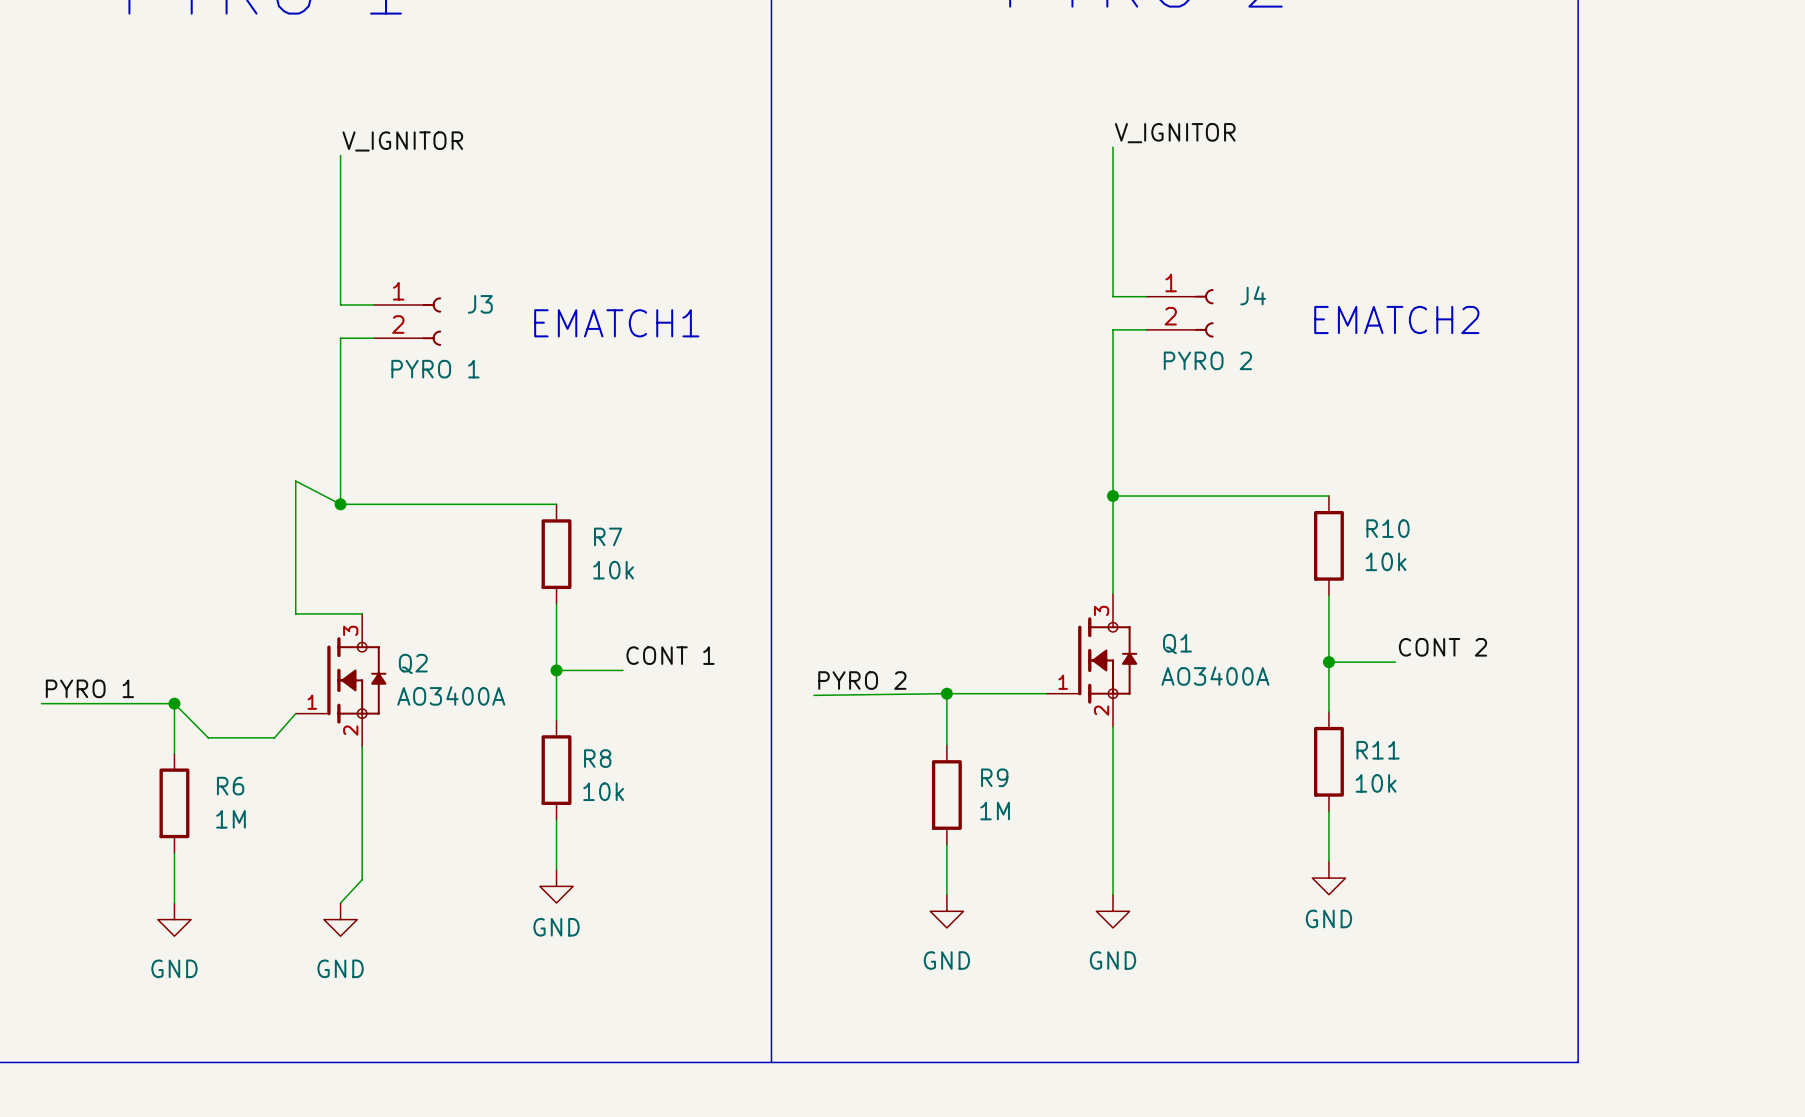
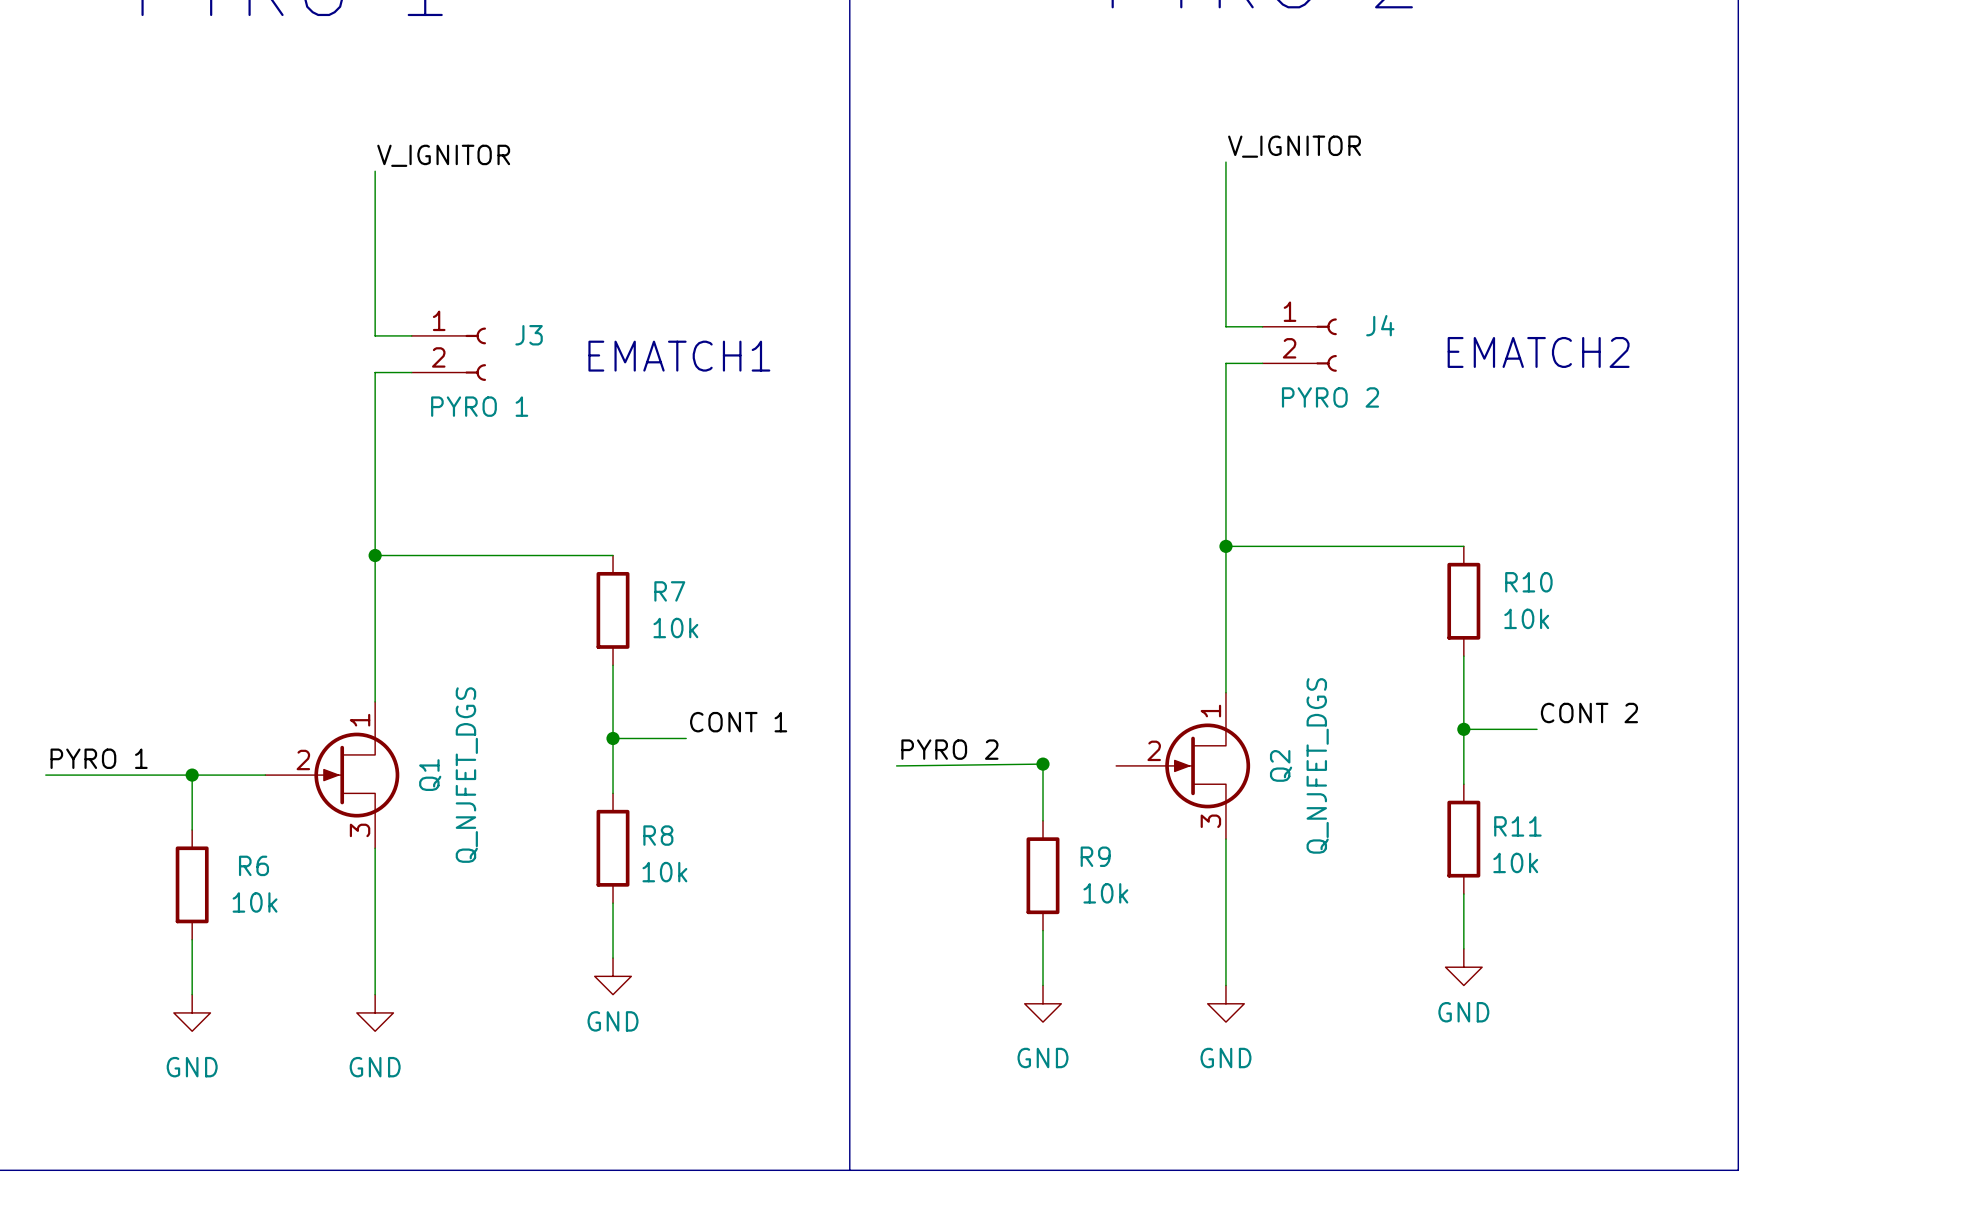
wire: (340, 504) (295, 481) (295, 613) (362, 613) -> (375, 555) (375, 701)
Q1 symbol: [1046, 594, 1138, 727] -> [265, 701, 400, 849]
Q2 symbol: [295, 613, 387, 747] -> [1116, 692, 1251, 840]
Q1 value: AO3400A (1215, 676) -> Q_NJFET_DGS (466, 775)
wire: (946, 693) (1046, 693) -> none
Q2 value: AO3400A (451, 696) -> Q_NJFET_DGS (1317, 765)
wire: (174, 703) (208, 737) (274, 737) (295, 713) -> (192, 775) (265, 775)
wire: (362, 746) (362, 879) (340, 902) -> (375, 848) (375, 994)
R9 value: 1M (995, 811) -> 10k (1105, 893)
R6 value: 1M (230, 819) -> 10k (255, 902)

